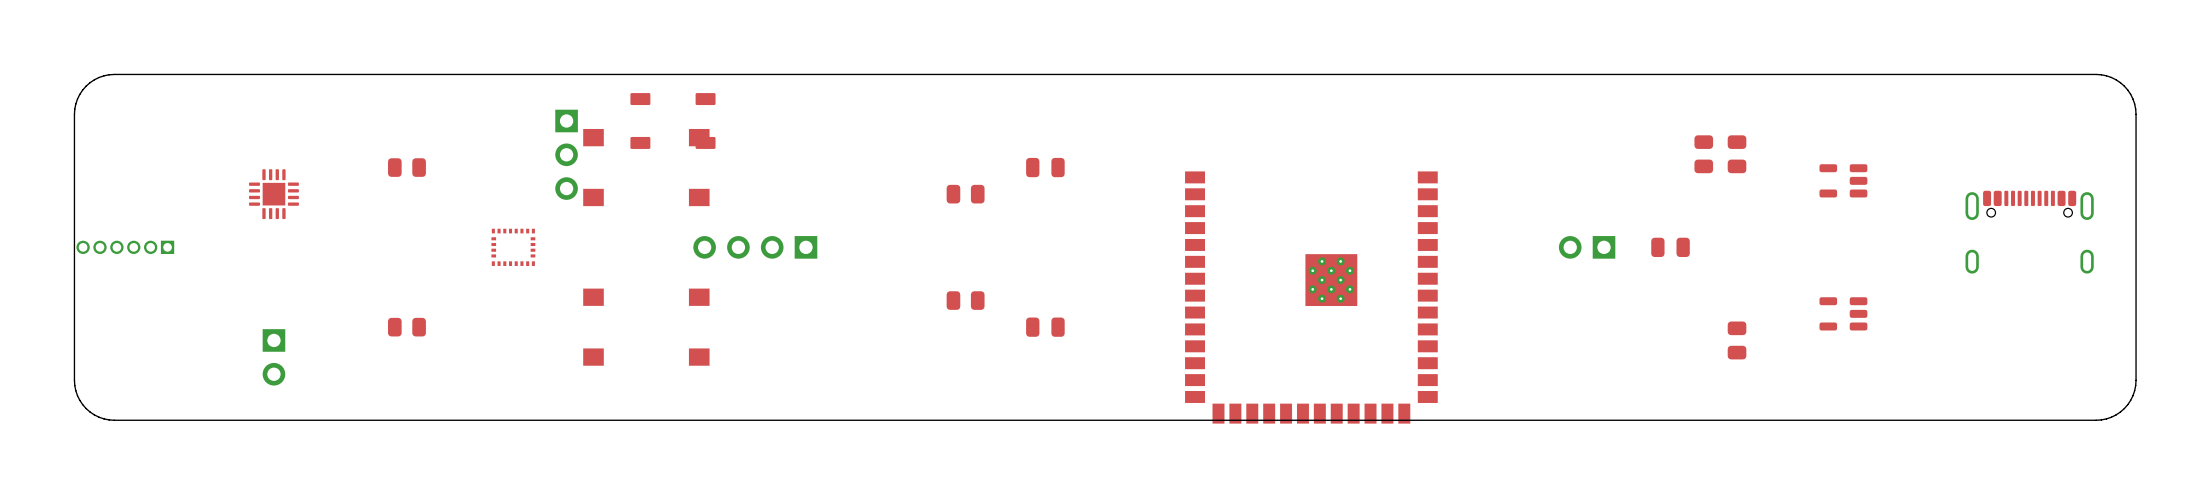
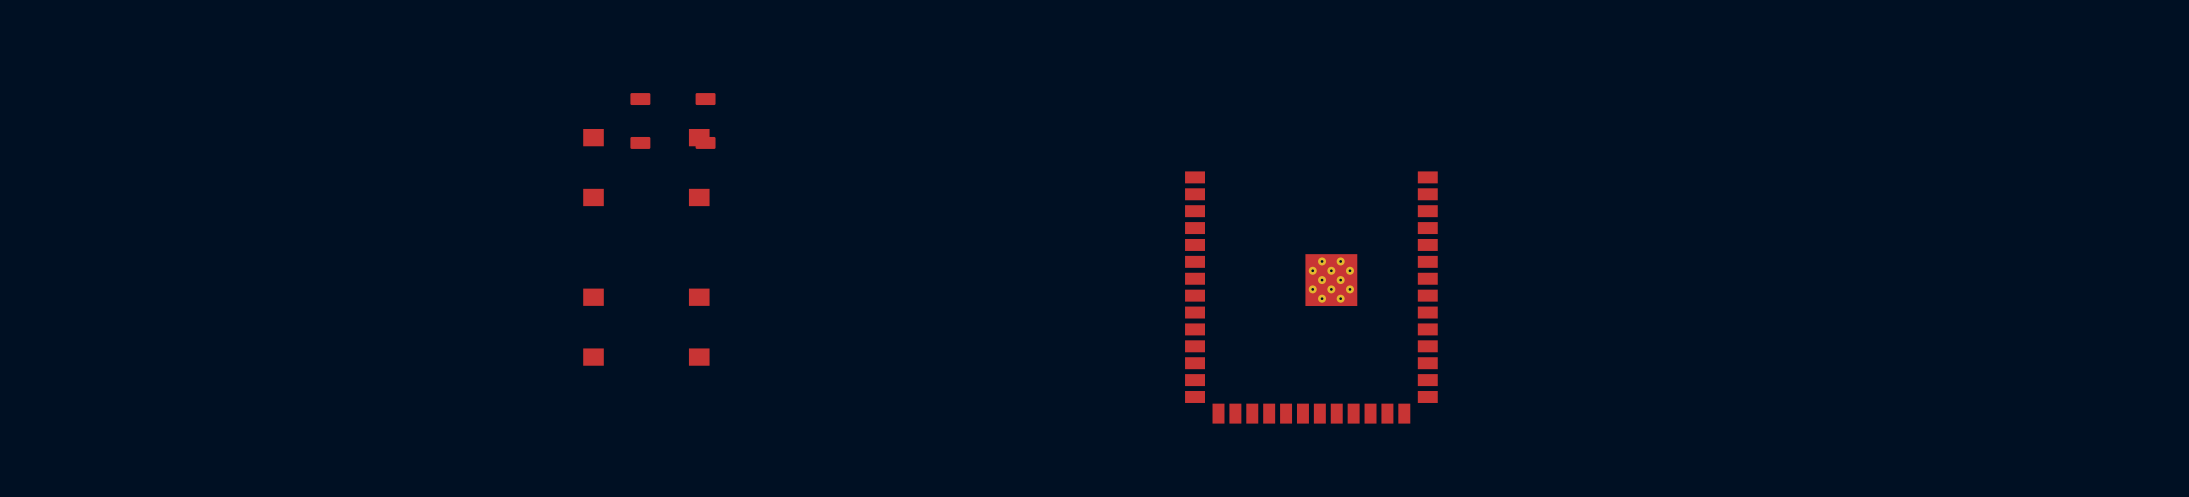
board edge: (2096, 74) (2111, 77) (2124, 86) (2132, 99) (2136, 114) (2135, 385) (2130, 400) (2124, 408) (2111, 417) (2101, 419) (114, 420) (104, 418) (90, 412) (79, 400) (74, 385) (74, 109) (77, 99) (86, 86) (94, 79) (109, 74) (2096, 74) -> none
part: (566, 154) -> none
part: (1703, 154) -> none
part: (1737, 154) -> none
part: (406, 167) -> none
part: (1045, 167) -> none
part: (1843, 180) -> none
part: (273, 194) -> none
part: (965, 194) -> none
part: (2029, 232) -> none
part: (125, 247) -> none
part: (513, 247) -> none
part: (755, 247) -> none
part: (1587, 247) -> none
part: (1670, 247) -> none
part: (965, 300) -> none
part: (1843, 313) -> none
part: (406, 327) -> none
part: (1045, 327) -> none
part: (1737, 340) -> none
part: (273, 357) -> none

